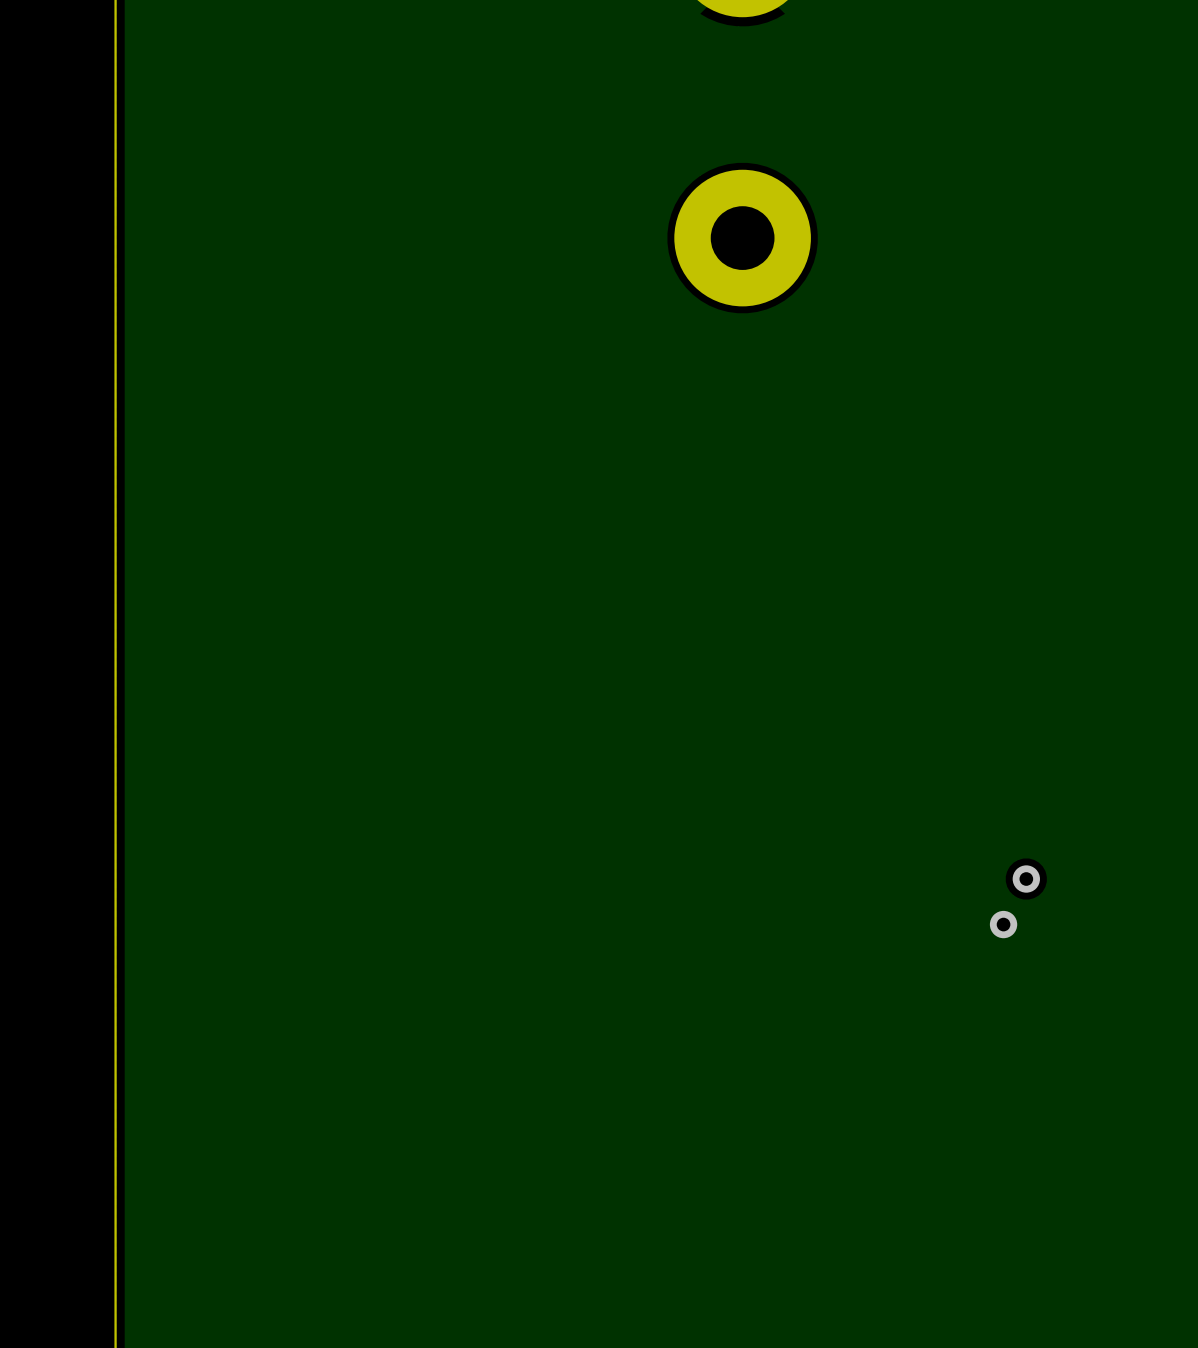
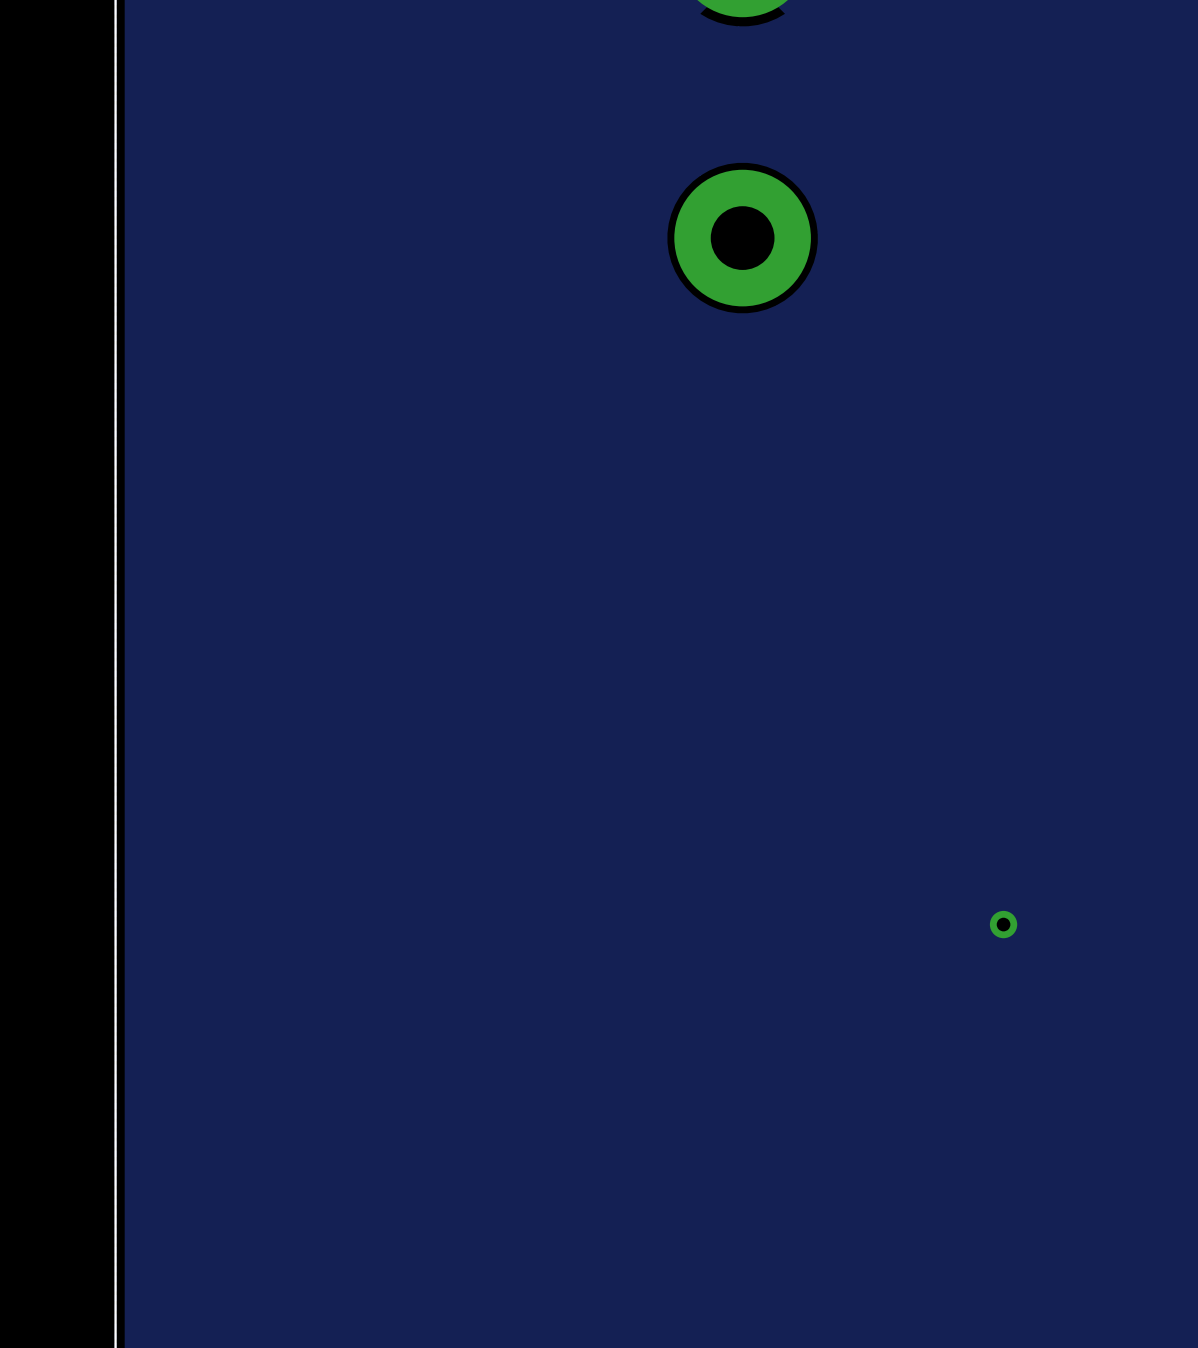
via: (1026, 879) -> none

